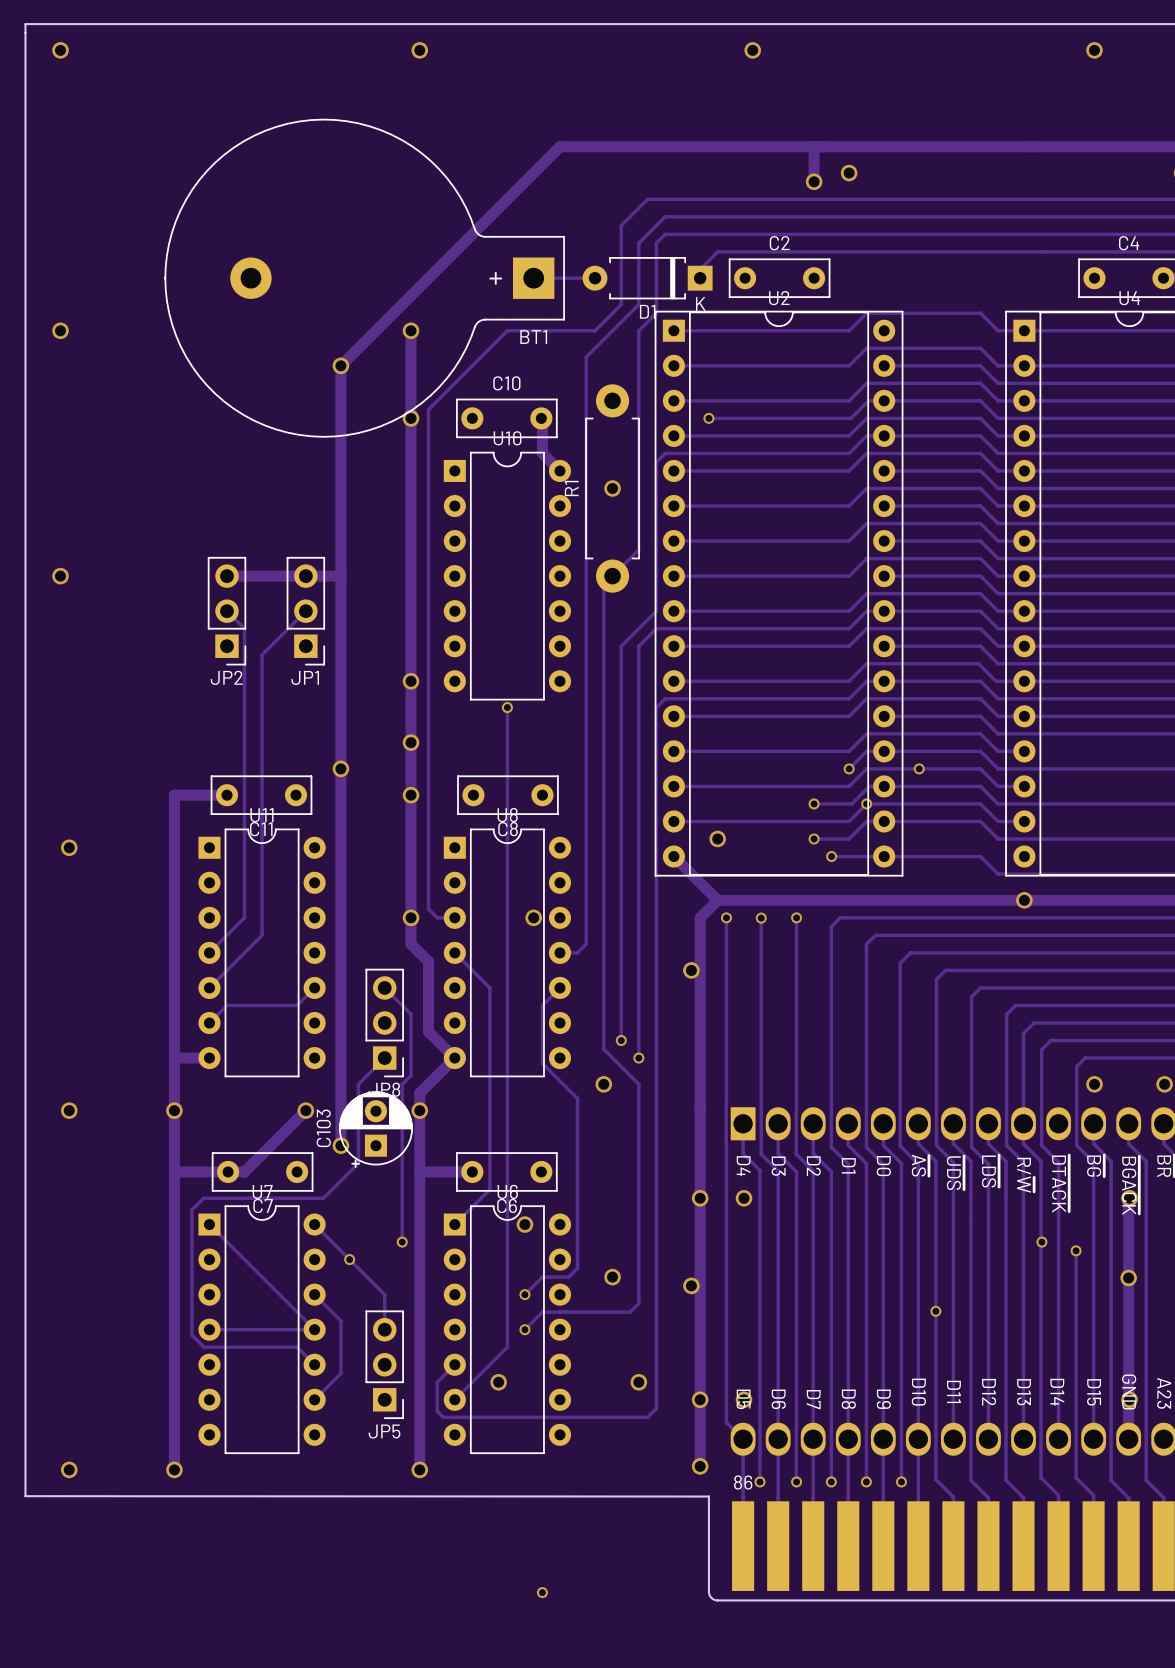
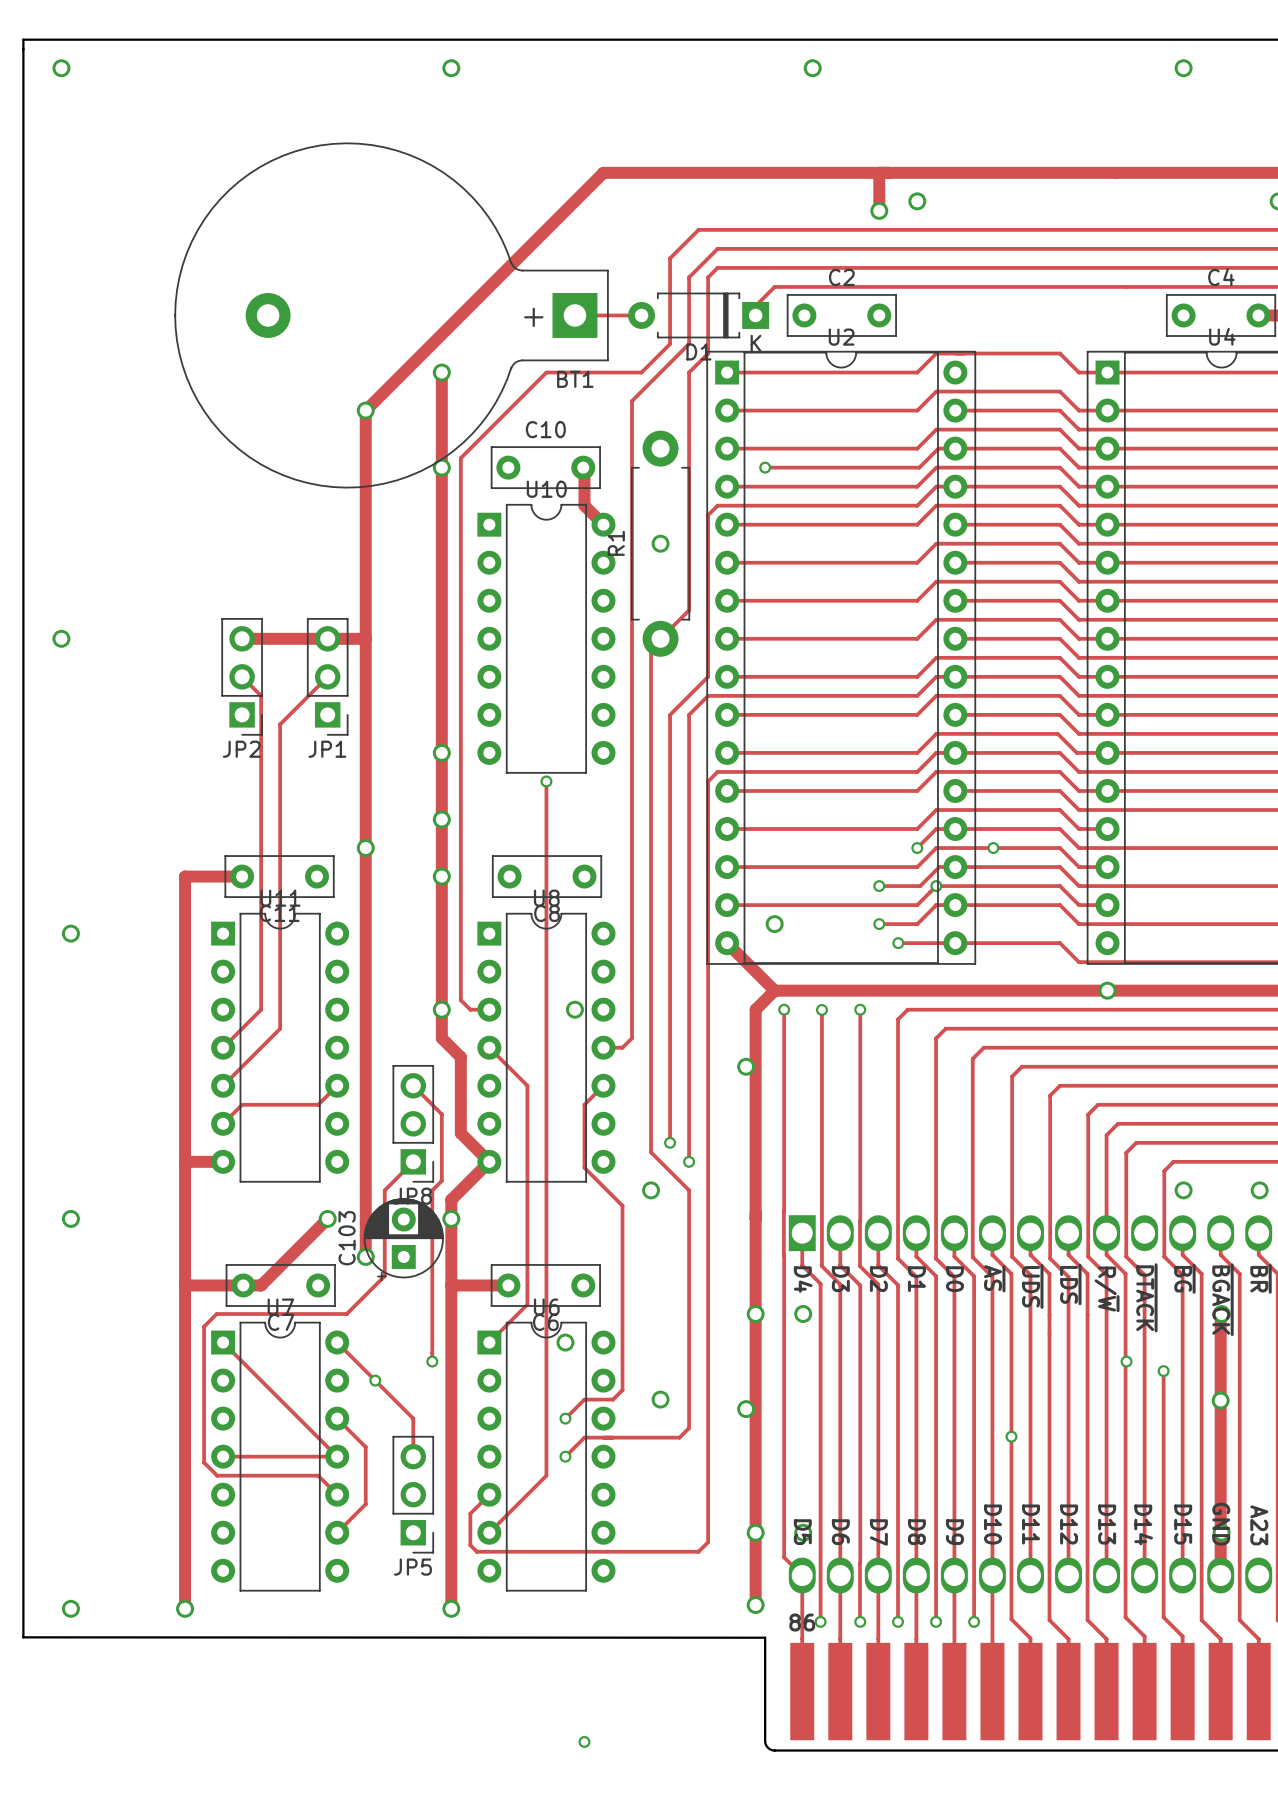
via: (60, 330) -> none
via: (174, 1110) -> none
via: (498, 1382) -> none
via: (638, 1382) -> none

